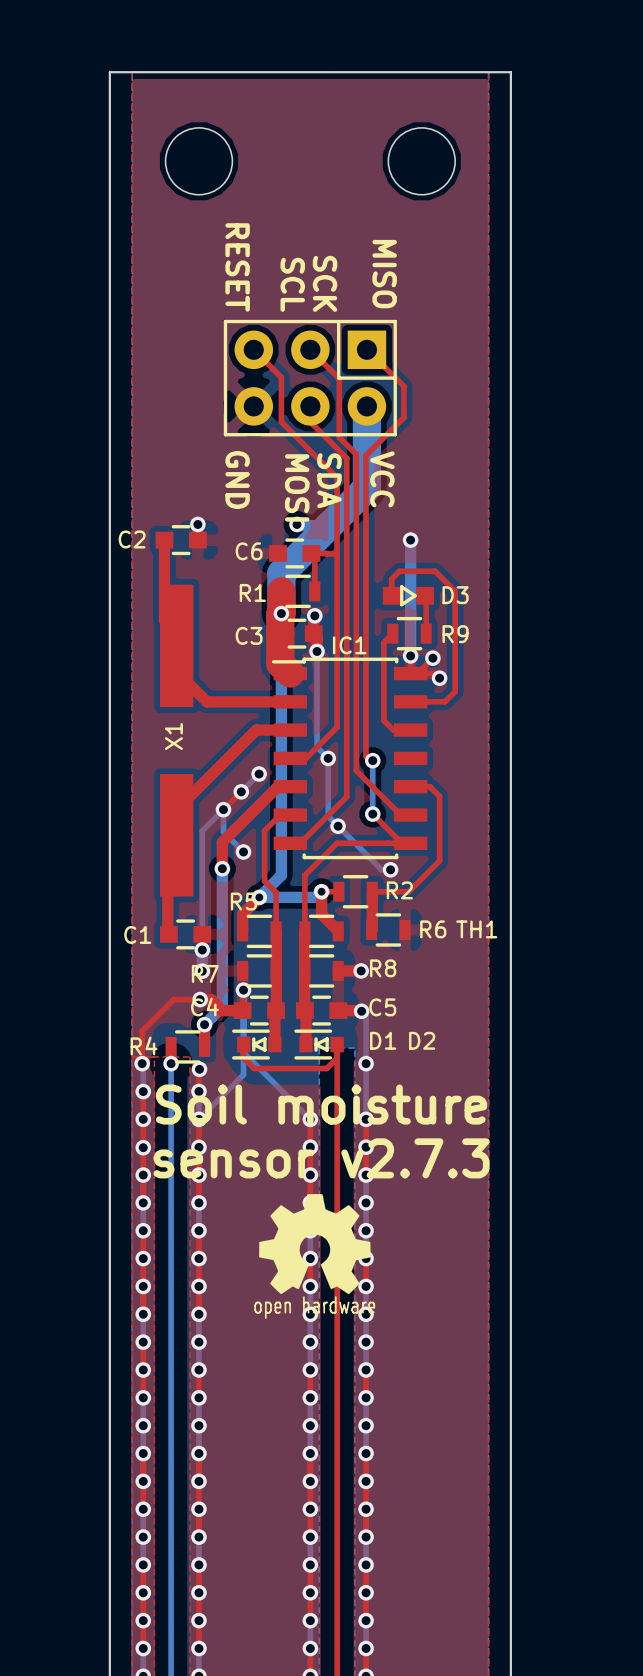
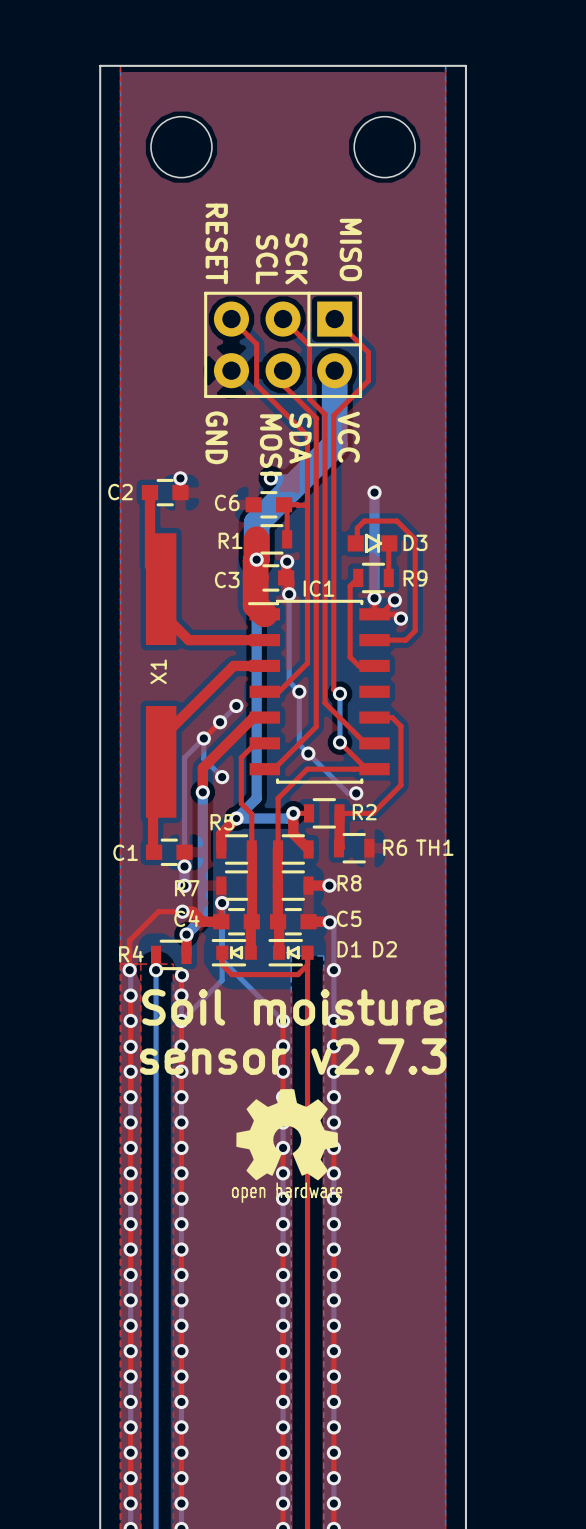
D3 footprint: [382, 585, 434, 607] -> [347, 533, 398, 554]

